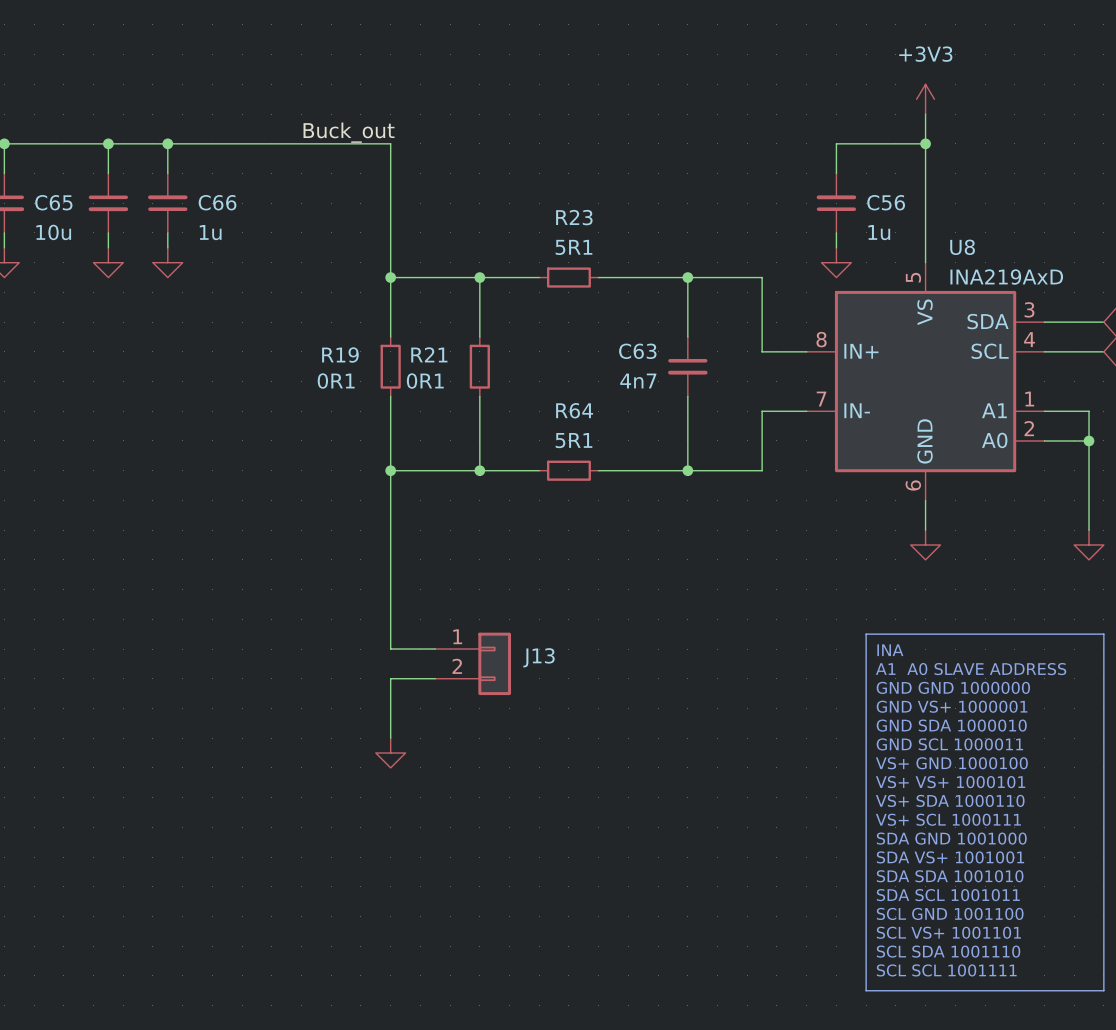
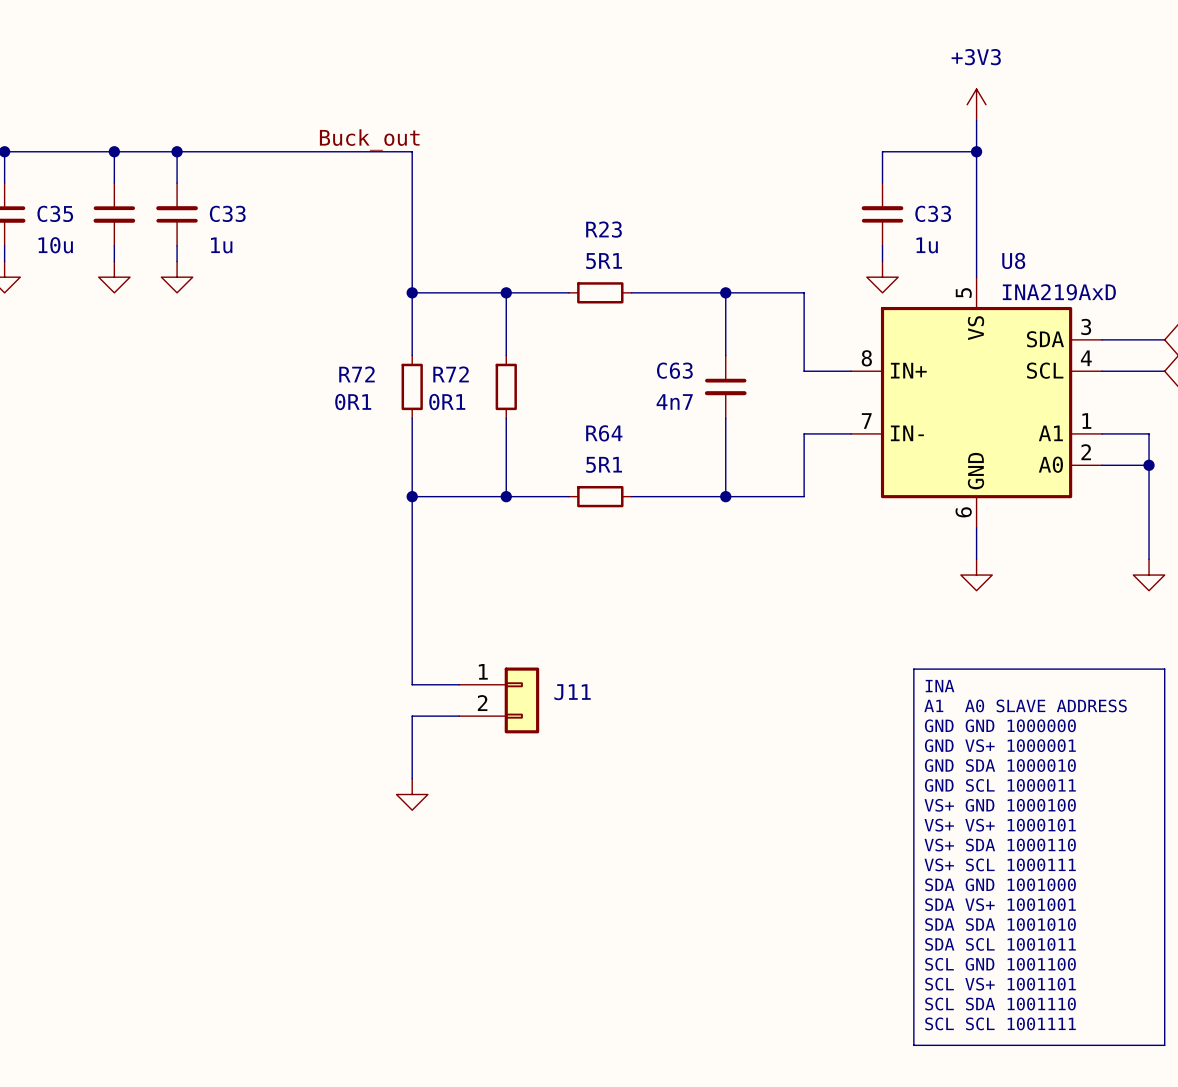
C65 name: C65 (53, 202) -> C35 (55, 213)
C66 name: C66 (217, 202) -> C33 (227, 213)
C56 name: C56 (886, 202) -> C33 (933, 213)
R21 name: R21 (429, 354) -> R72 (451, 374)
R19 name: R19 (340, 355) -> R72 (357, 374)
J13 name: J13 (539, 657) -> J11 (572, 692)

